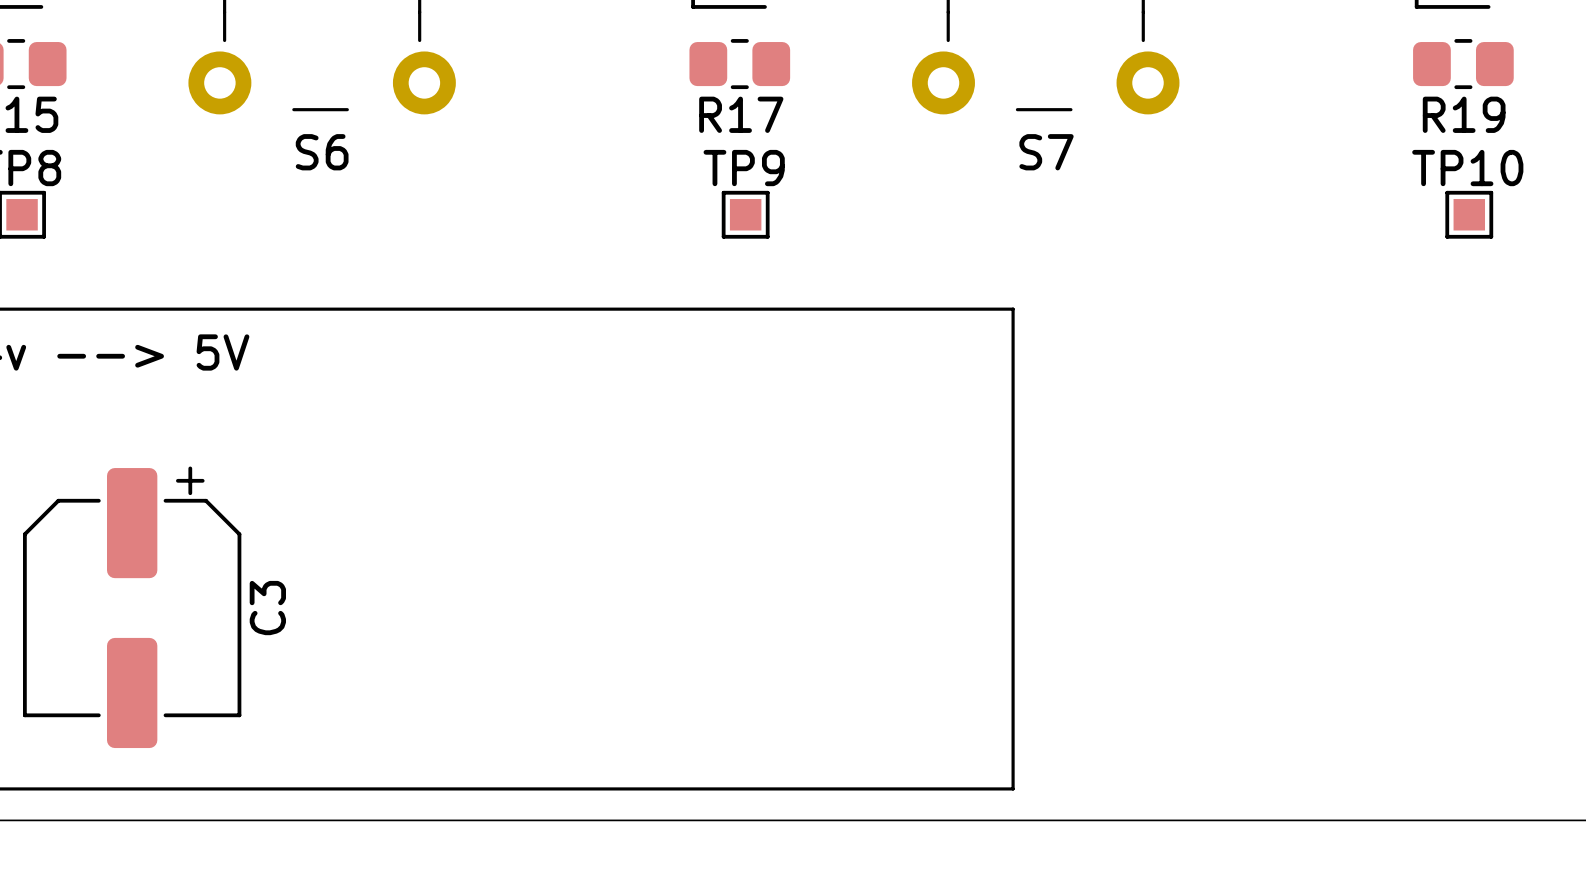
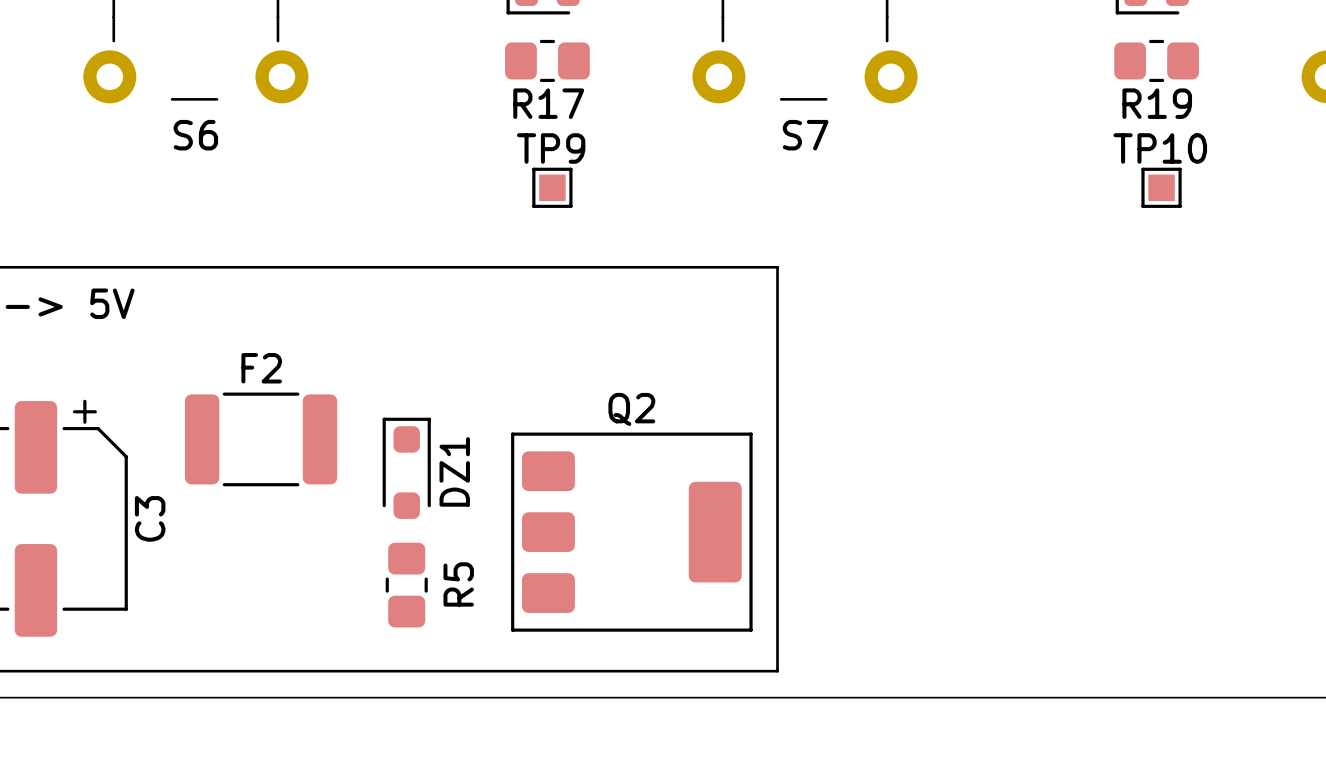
F2: none -> (261, 439)
DZ1: none -> (406, 468)
Q2: none -> (631, 532)
R5: none -> (406, 585)

